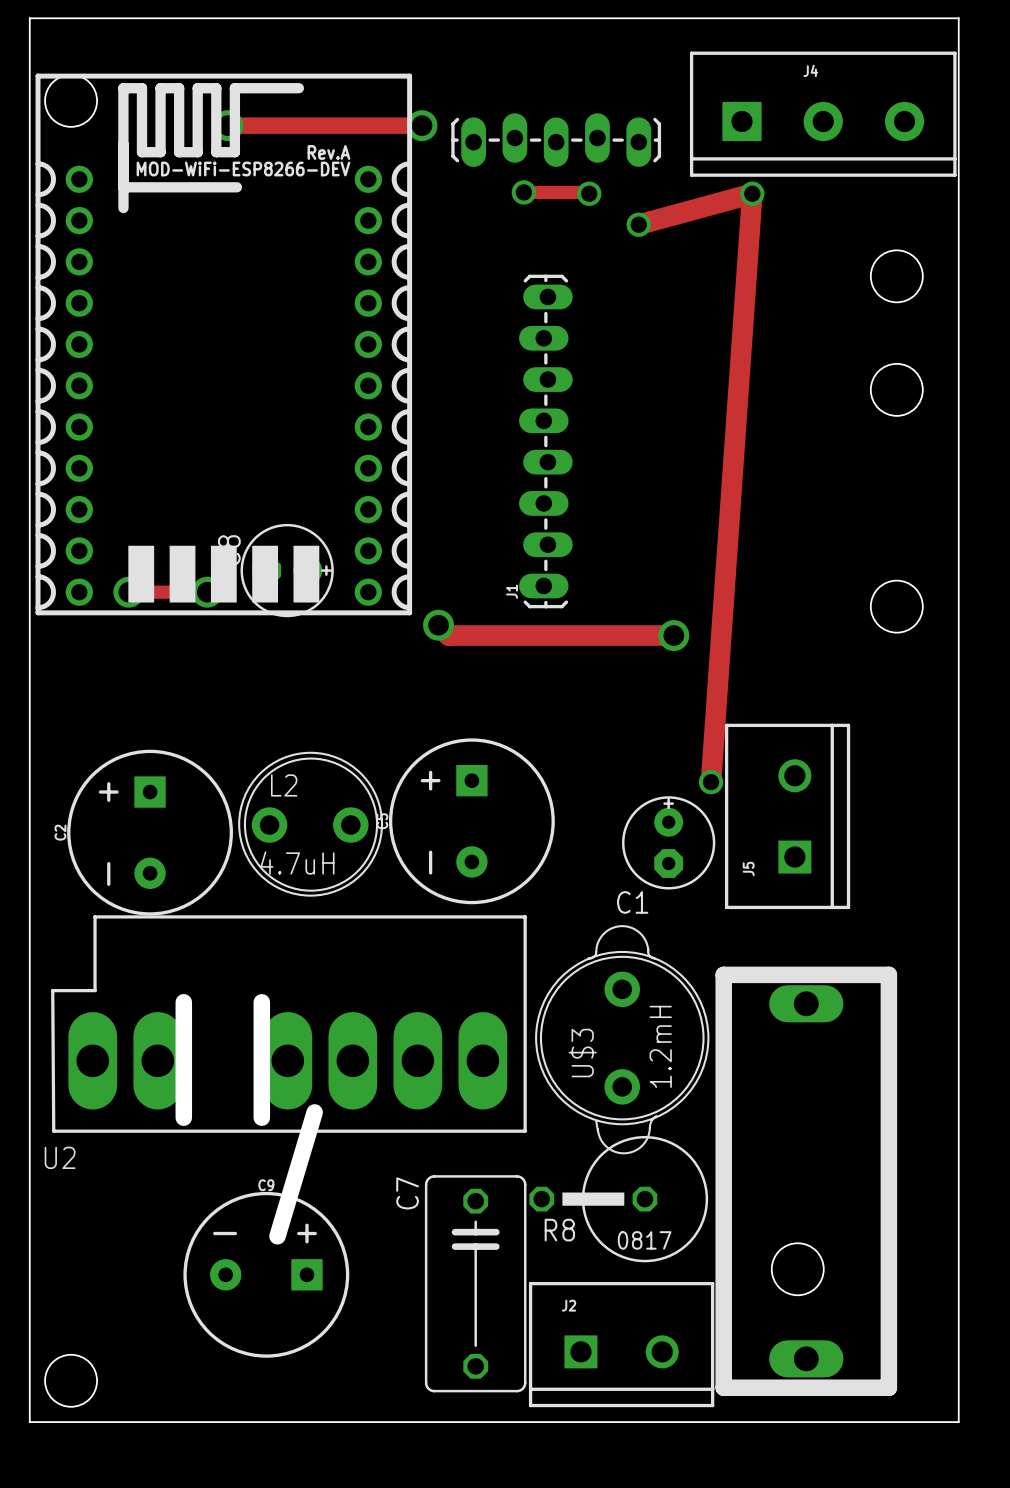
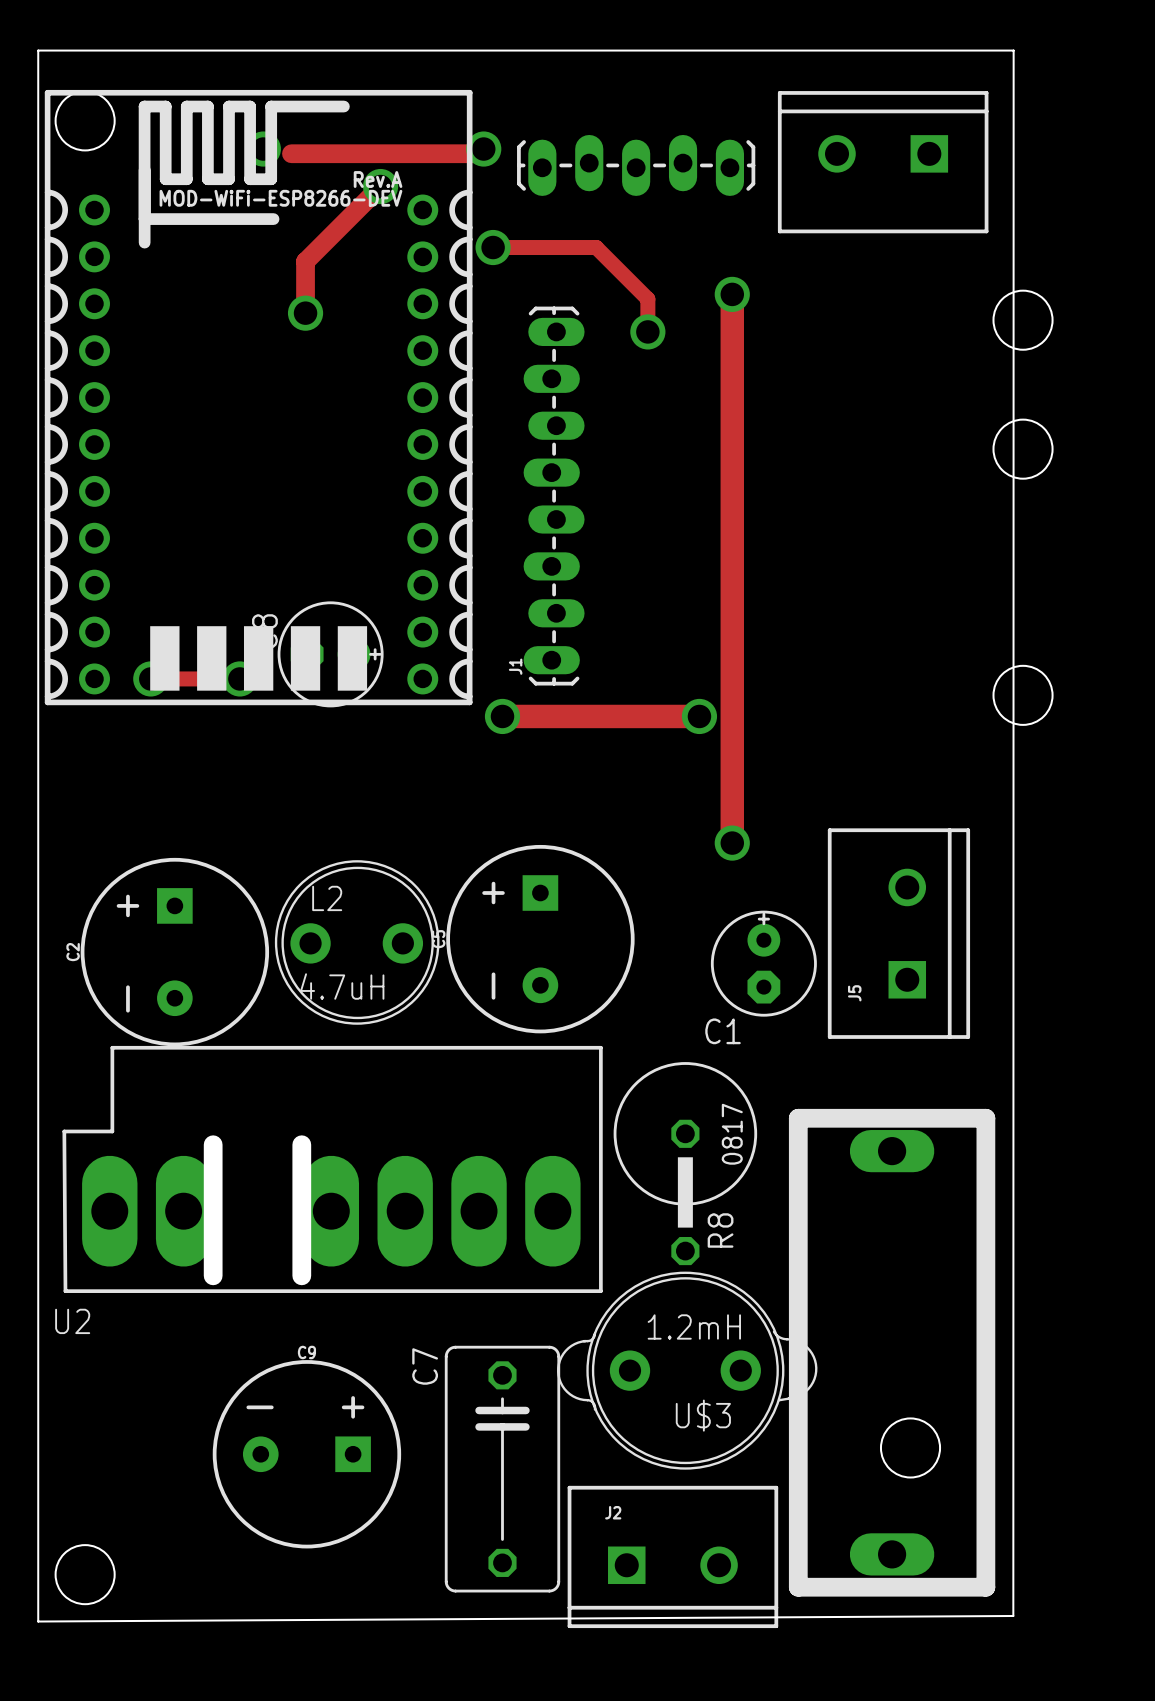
board edge: (29, 38) (29, 18) (958, 18) (958, 1422) (29, 1422) -> (38, 50) (1013, 50) (1013, 1615) (38, 1621)
J4: (823, 114) -> none
track: (227, 125) (422, 125) -> (291, 153) (479, 153) (483, 149)
part: none -> (883, 162)
track: none -> (380, 186) (305, 261) (305, 313)
via: none -> (380, 186)
track: (523, 192) (589, 193) -> none
via: (523, 192) -> none
via: (589, 193) -> none
via: (752, 193) -> none
track: none -> (493, 247) (596, 247) (647, 299) (647, 322) (643, 327) (647, 331)
via: none -> (493, 247)
track: (638, 224) (752, 193) (711, 782) -> none
via: (638, 224) -> none
track: none -> (732, 294) (732, 843)
via: none -> (732, 294)
via: none -> (305, 313)
via: none -> (647, 331)
J1 position: (545, 441) -> (554, 496)
track: (438, 625) (448, 635) (673, 635) -> (502, 716) (699, 716)
via: none -> (699, 716)
via: (673, 635) -> none
via: none -> (732, 843)
via: (711, 782) -> none
U$3 rotation: 0° (622, 1039) -> 90° counterclockwise (687, 1370)
U$3 position: (622, 1039) -> (687, 1370)
board edge: (314, 1112) (277, 1236) -> none
part position: (806, 1181) -> (892, 1352)
R8 rotation: 0° (618, 1199) -> 90° counterclockwise (685, 1163)
R8 position: (618, 1199) -> (685, 1163)
C7 position: (475, 1283) -> (502, 1469)
J2 position: (621, 1344) -> (672, 1556)

